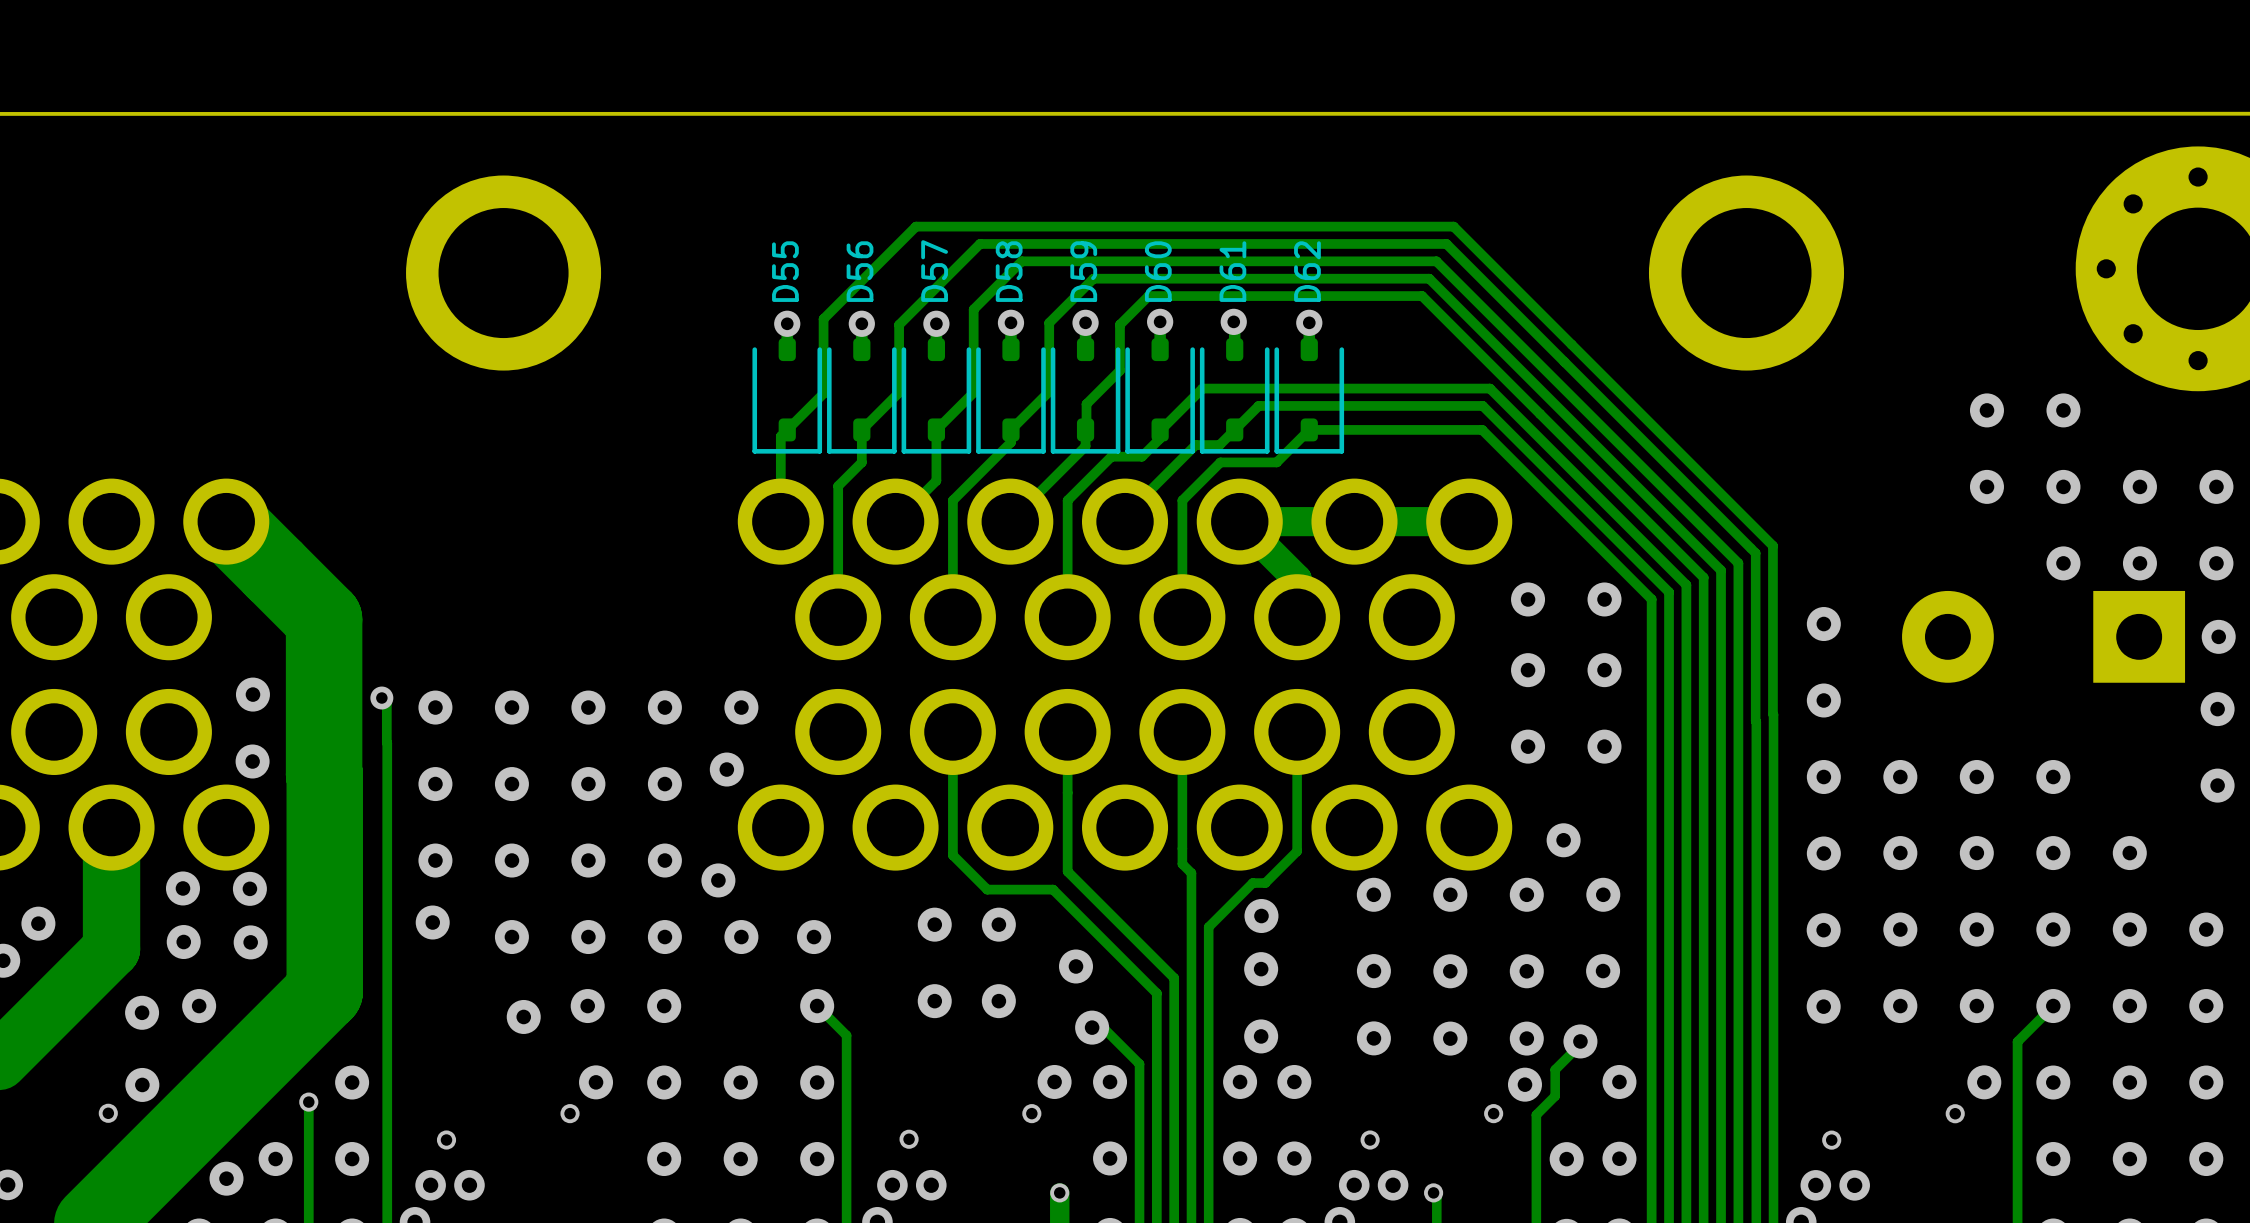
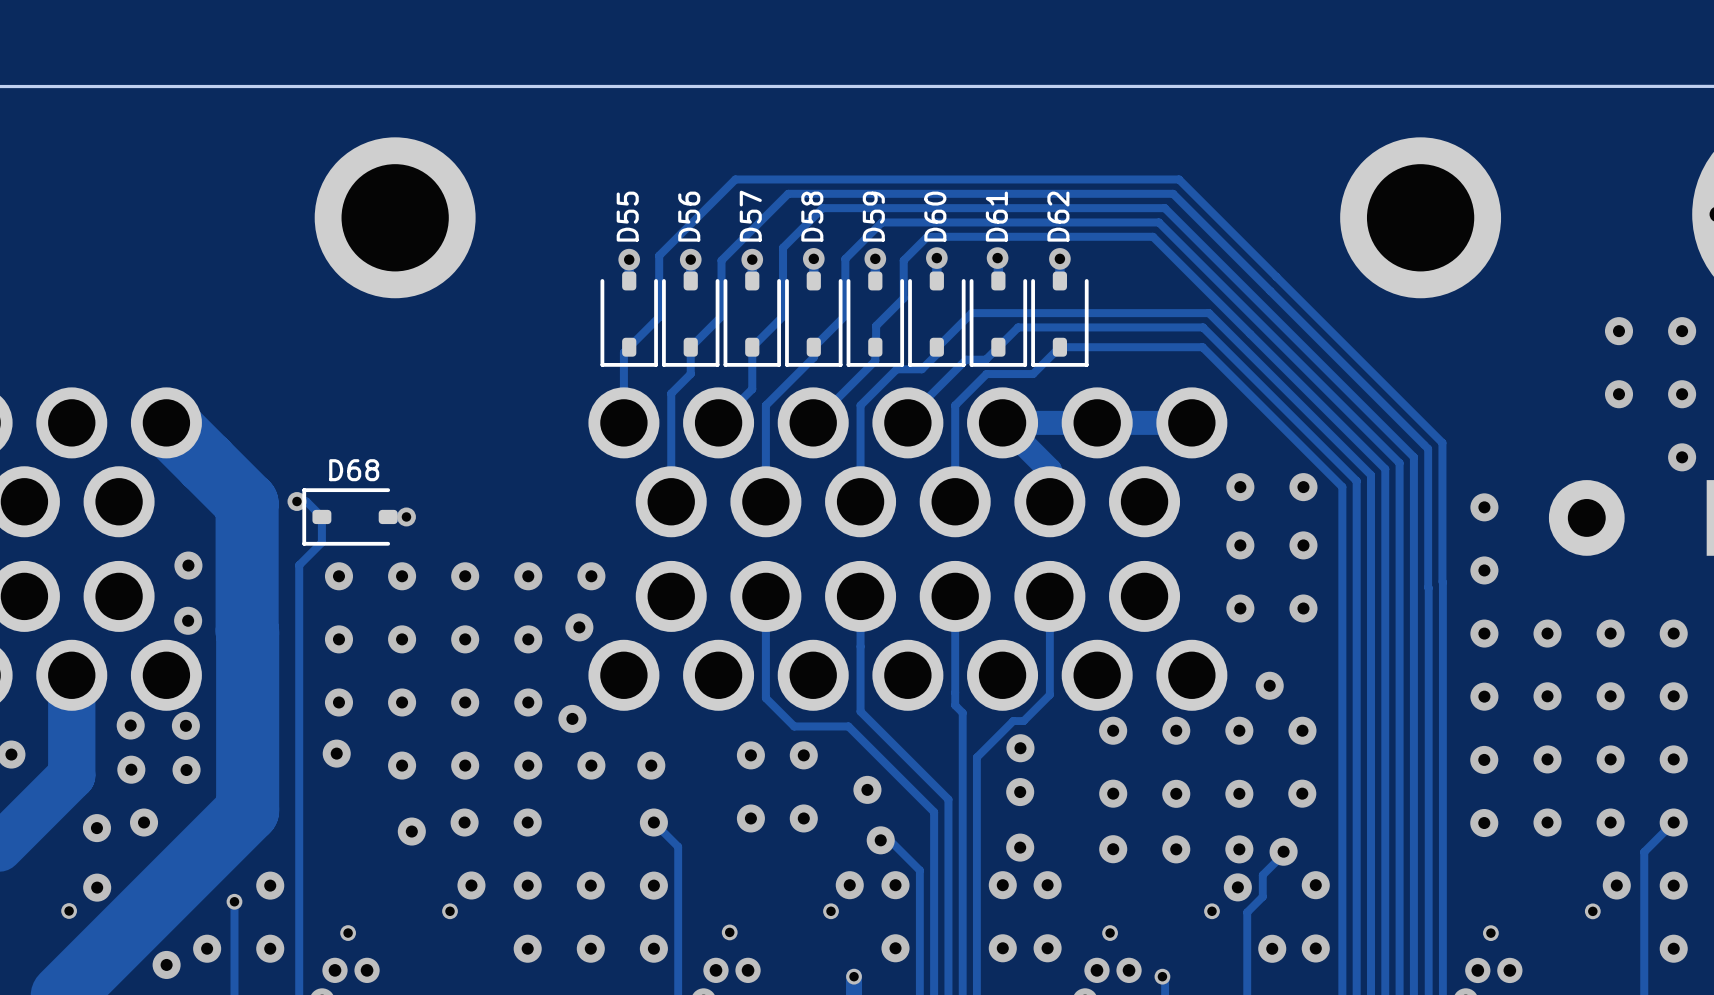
via: none -> (296, 501)
D68: none -> (349, 516)
via: none -> (406, 516)
track: (381, 698) (386, 702) (386, 742) -> (296, 501) (306, 501) (321, 516) (321, 542) (299, 565) (299, 605)
via: (381, 698) -> none

